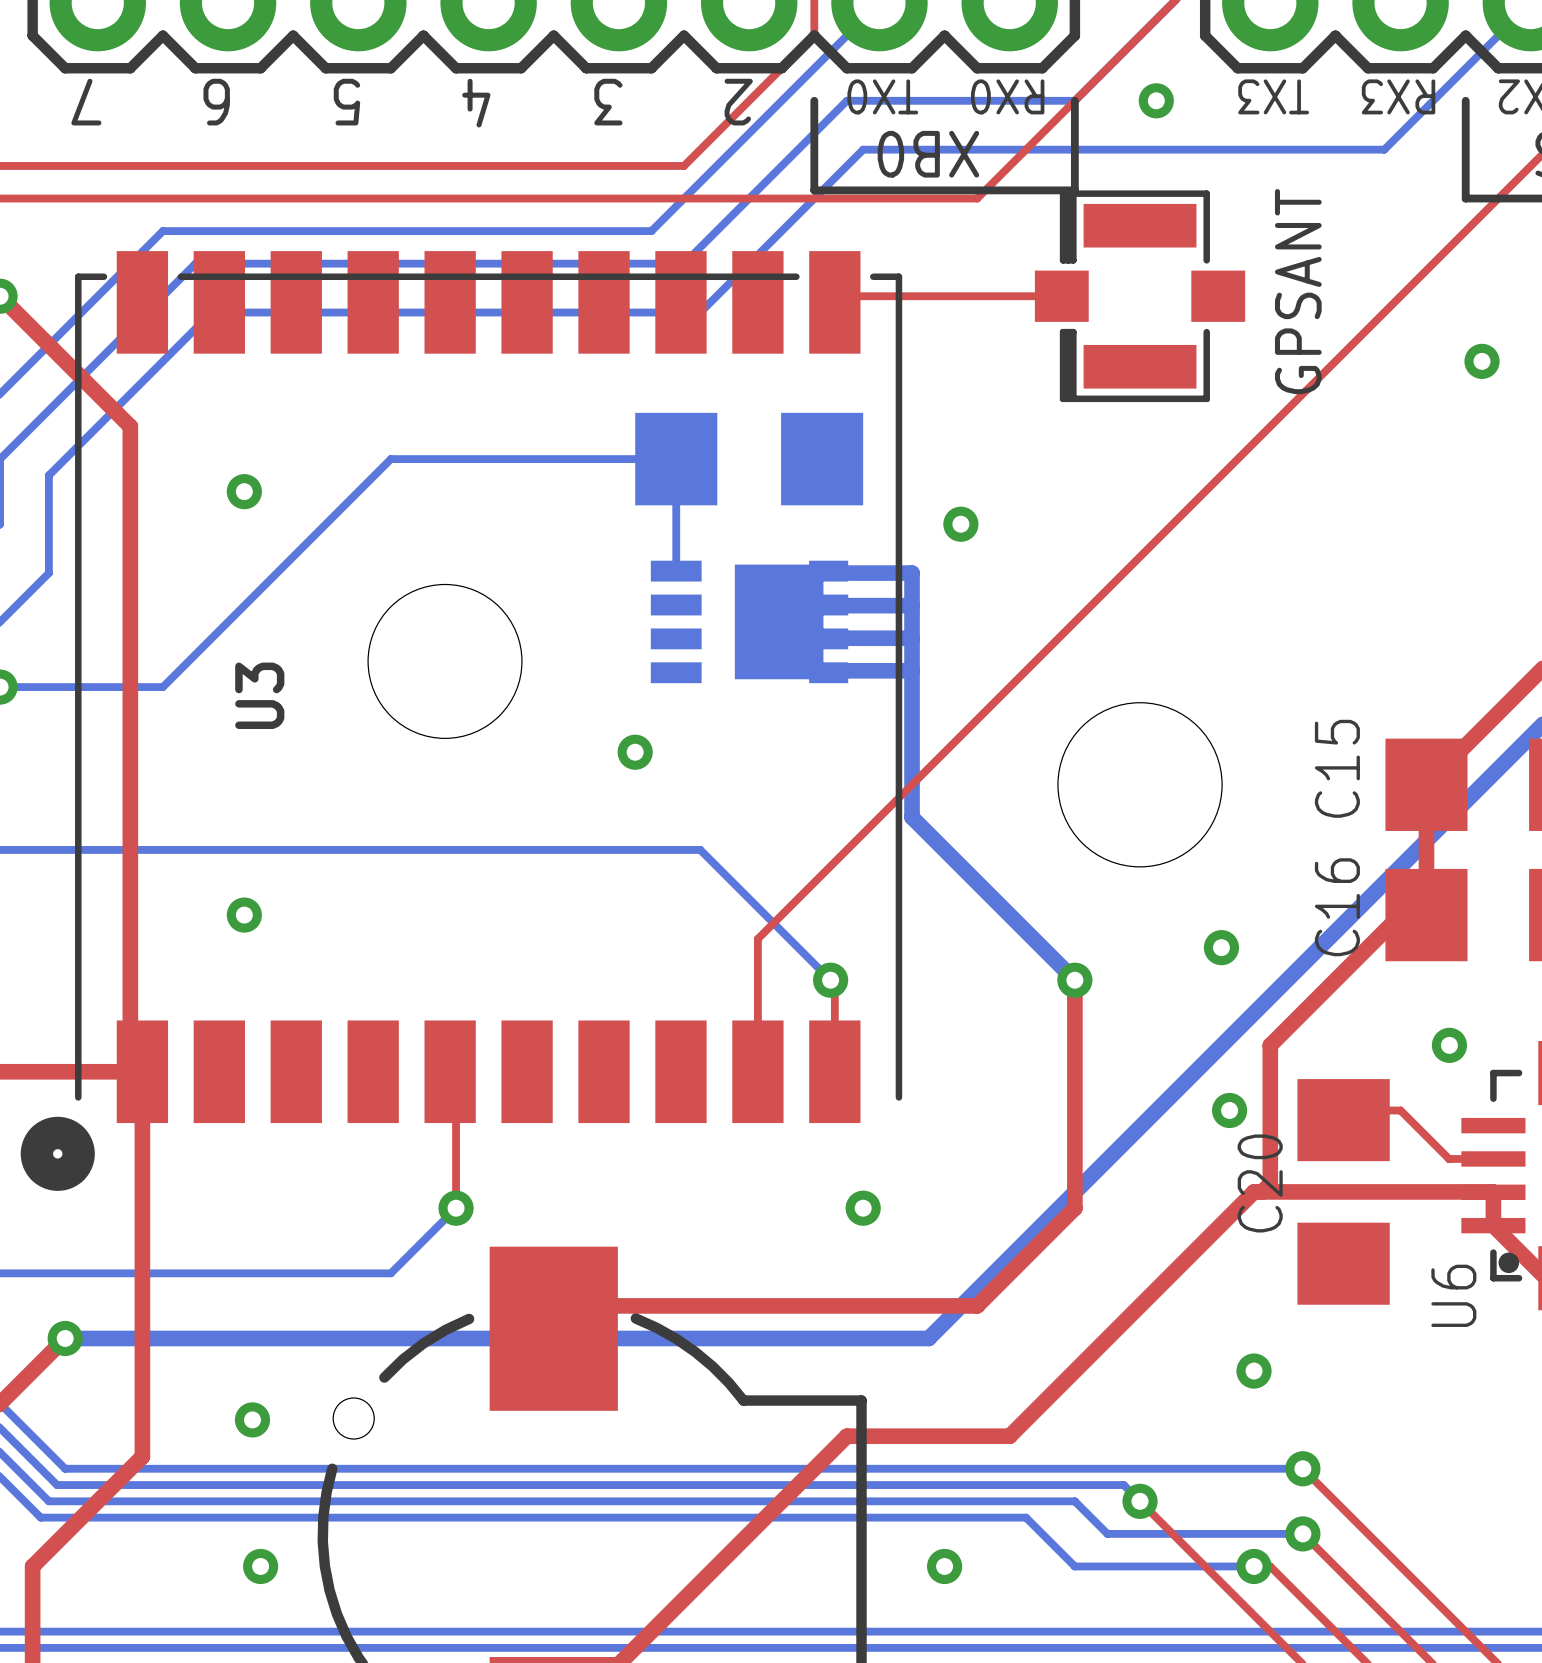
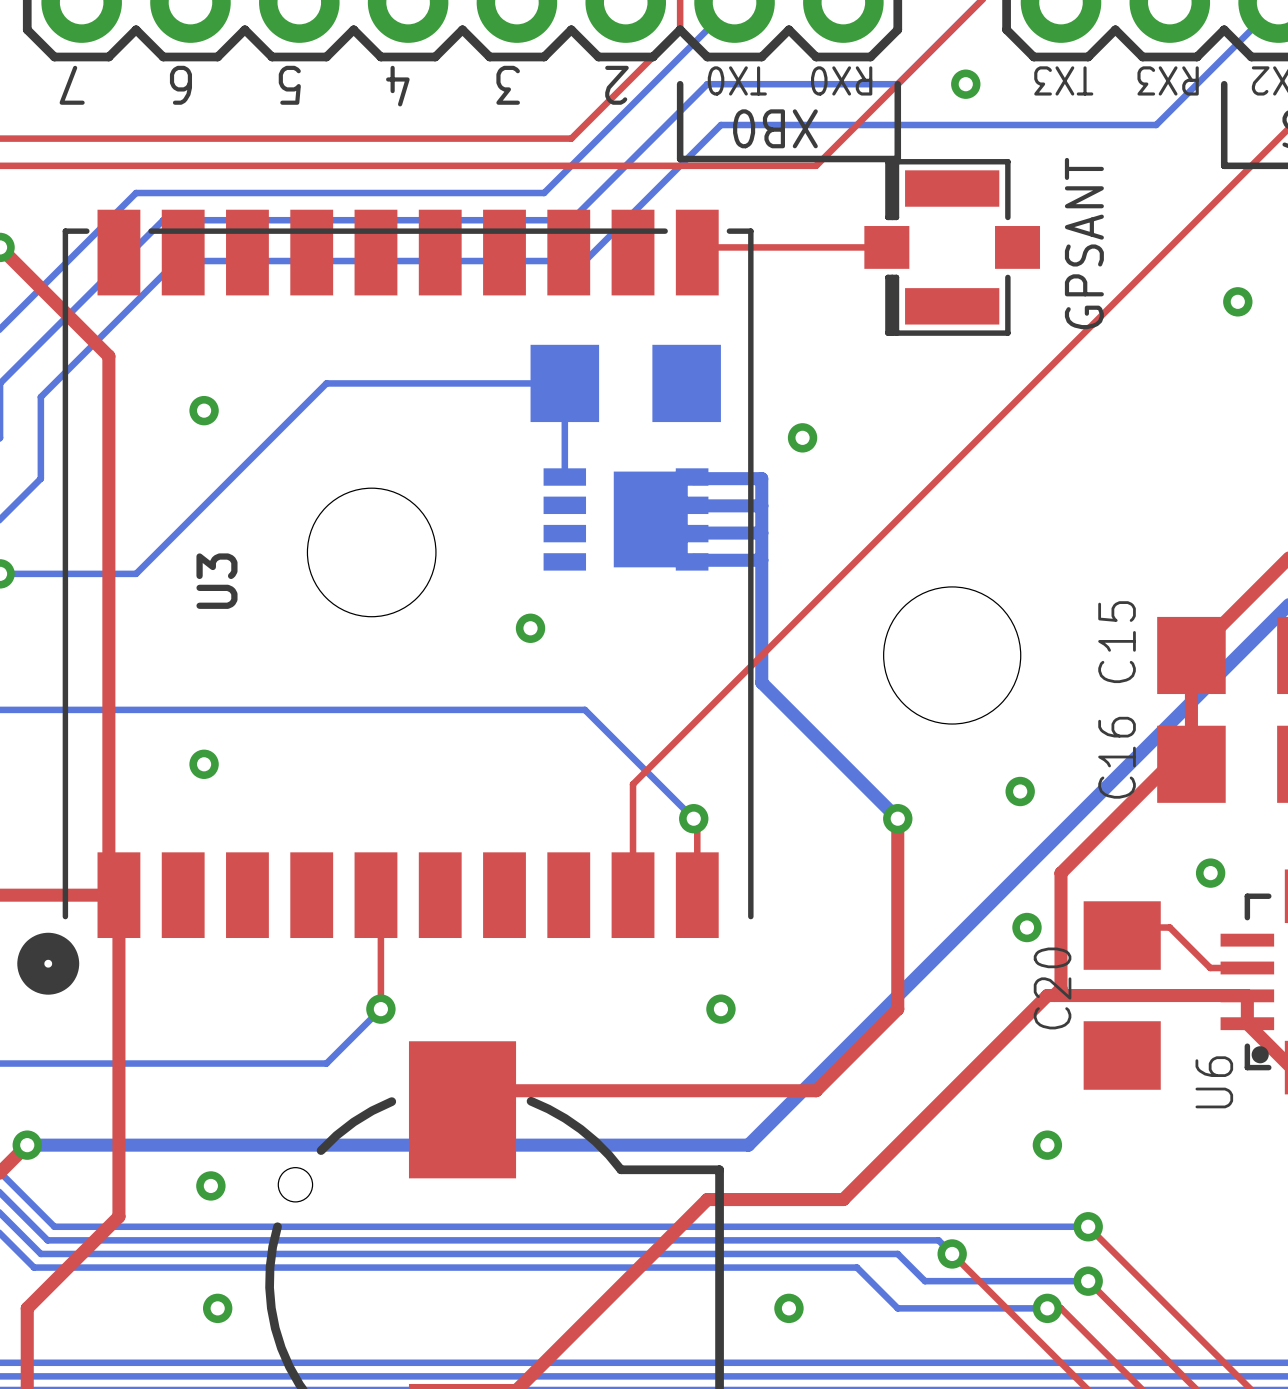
bottom track: (65, 1338) (928, 1338) -> (27, 1145) (748, 1145) (775, 1117)
top track: (65, 1338) (32, 1371) -> none
via position: (65, 1338) -> (27, 1145)

